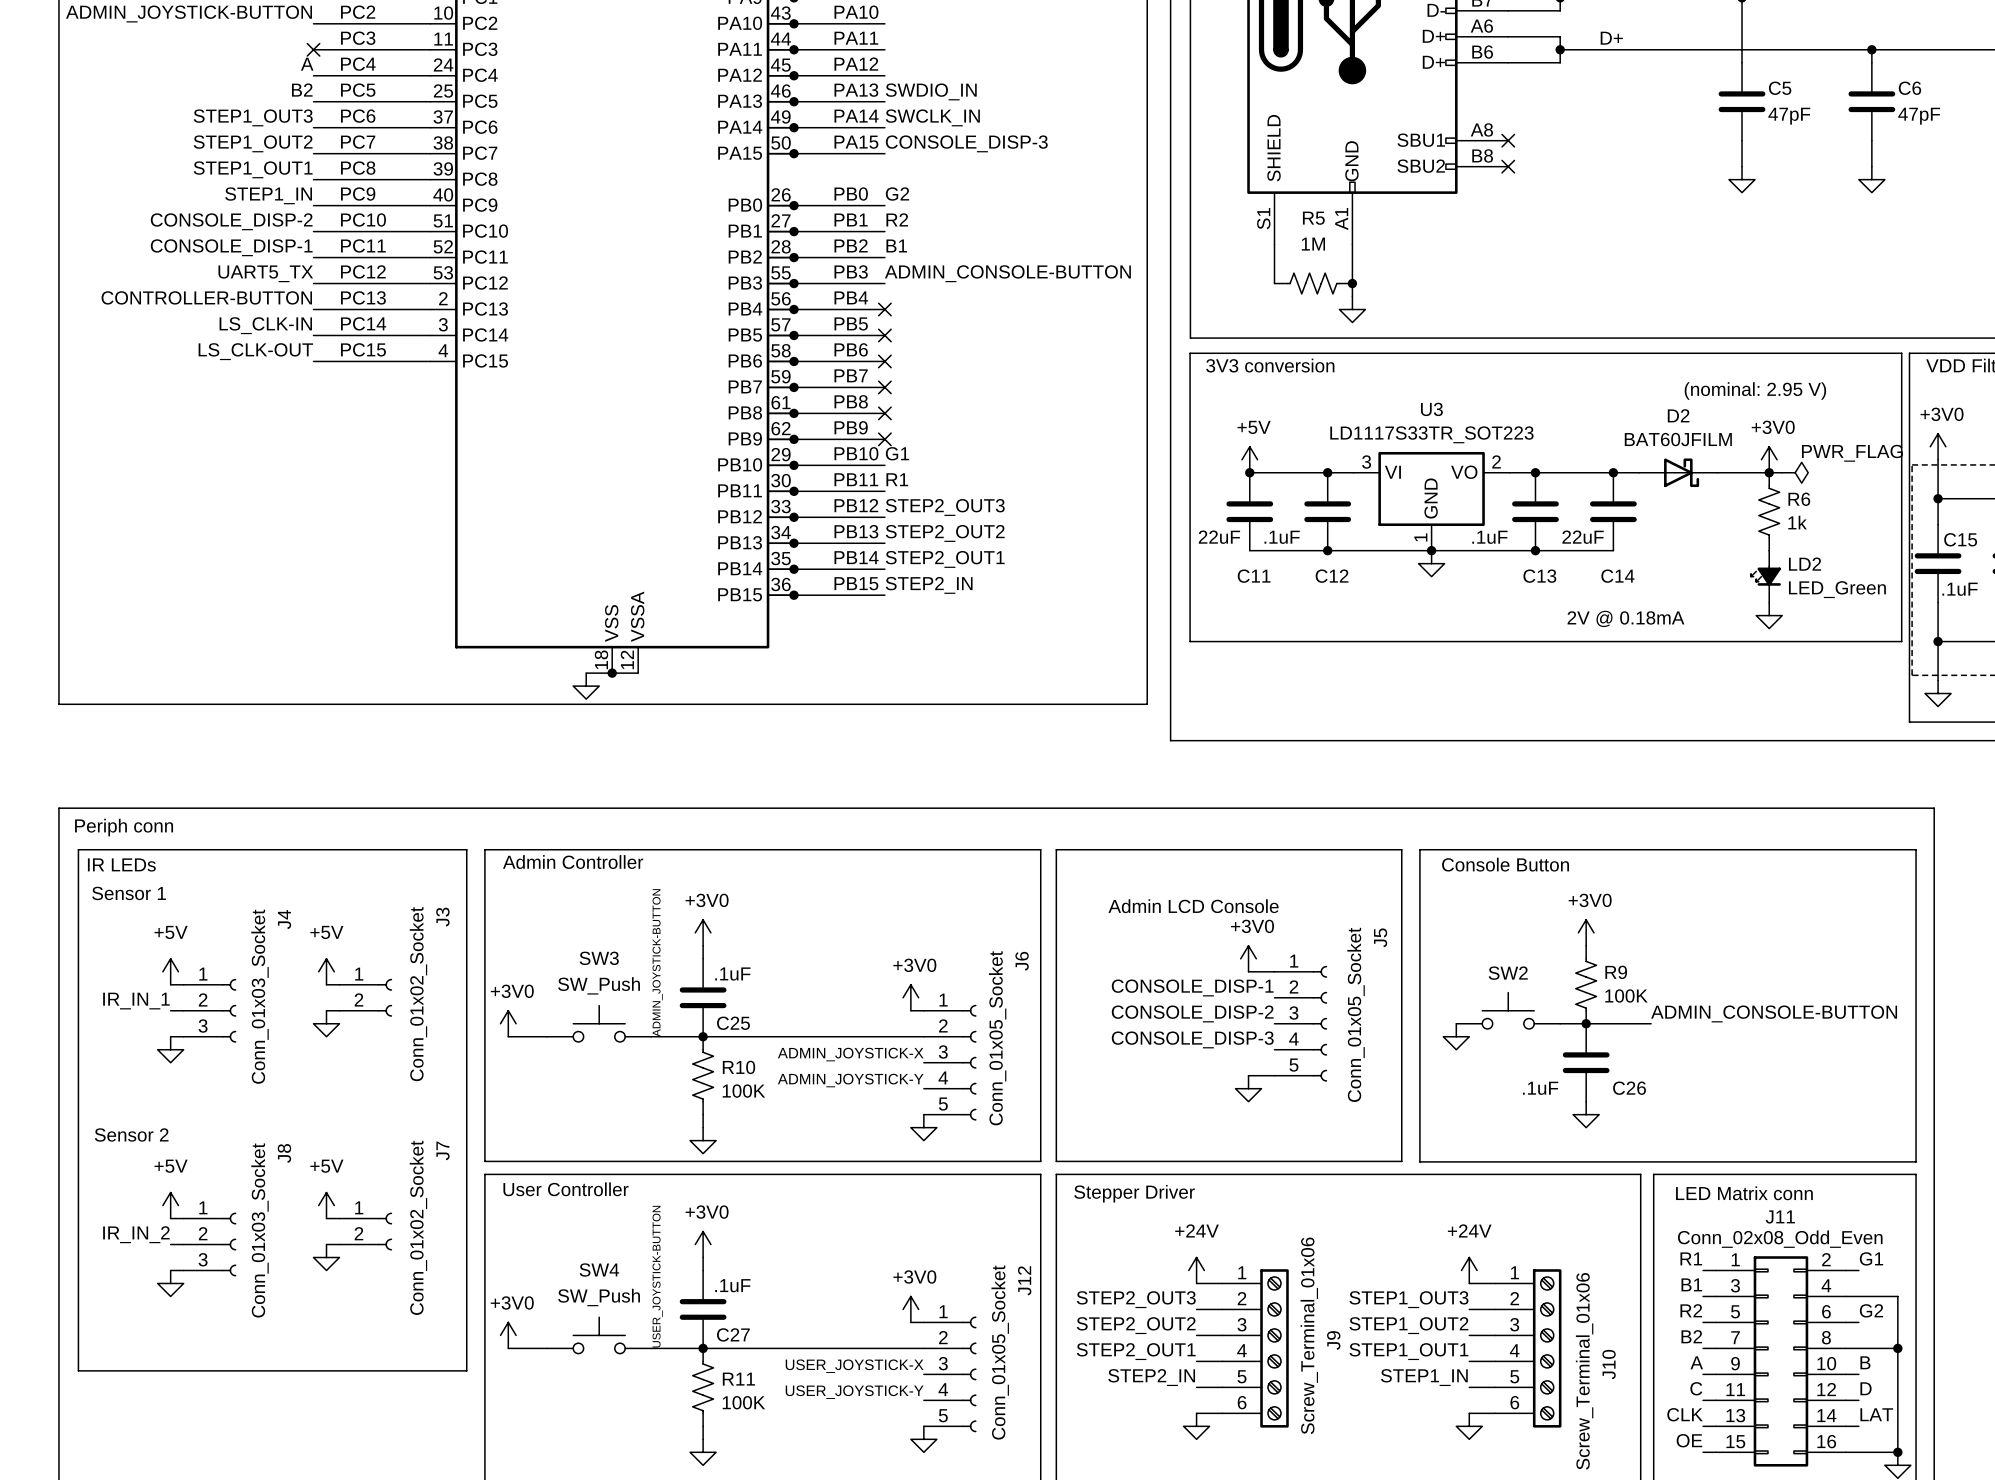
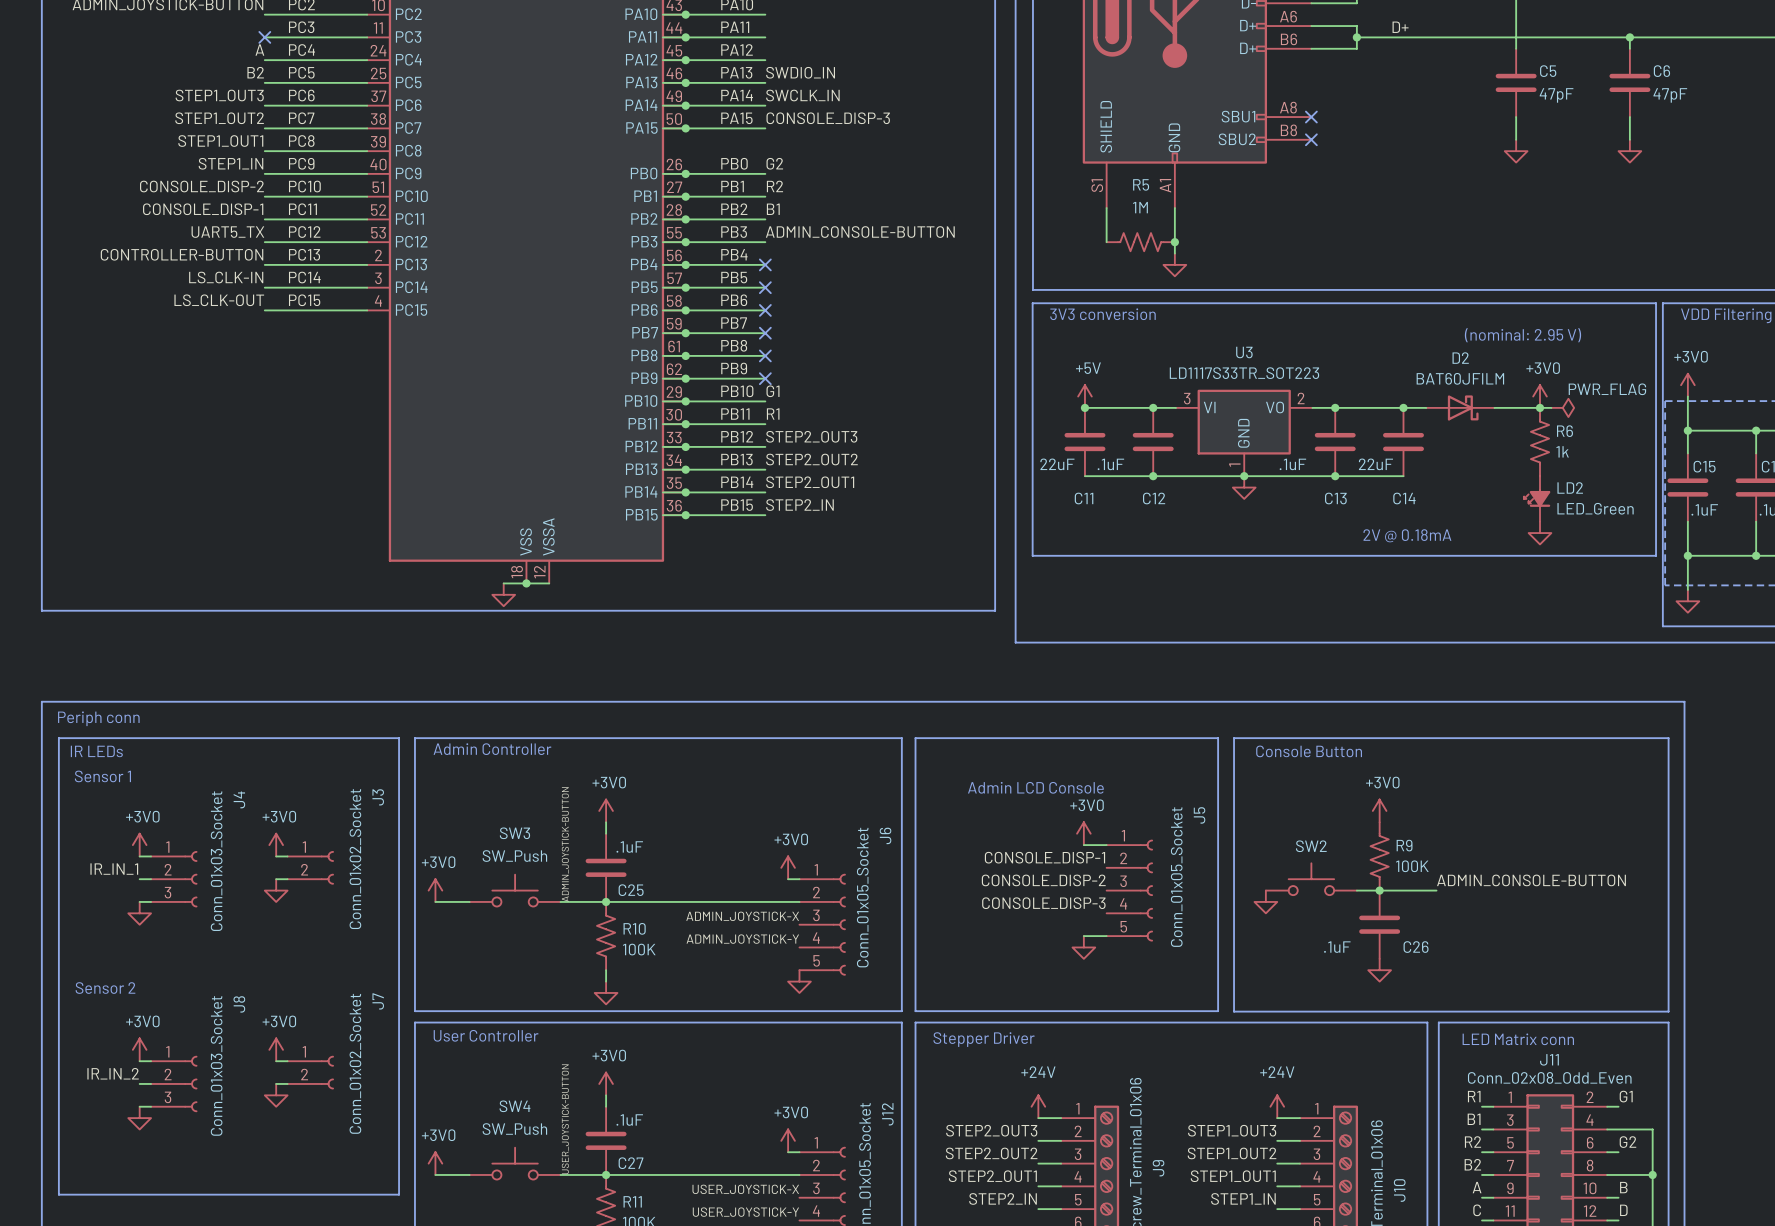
power symbol: +5V (170, 971) -> +3V0 (139, 845)
power symbol: +5V (326, 971) -> +3V0 (276, 845)
power symbol: +5V (170, 1205) -> +3V0 (139, 1049)
power symbol: +5V (326, 1205) -> +3V0 (276, 1049)

